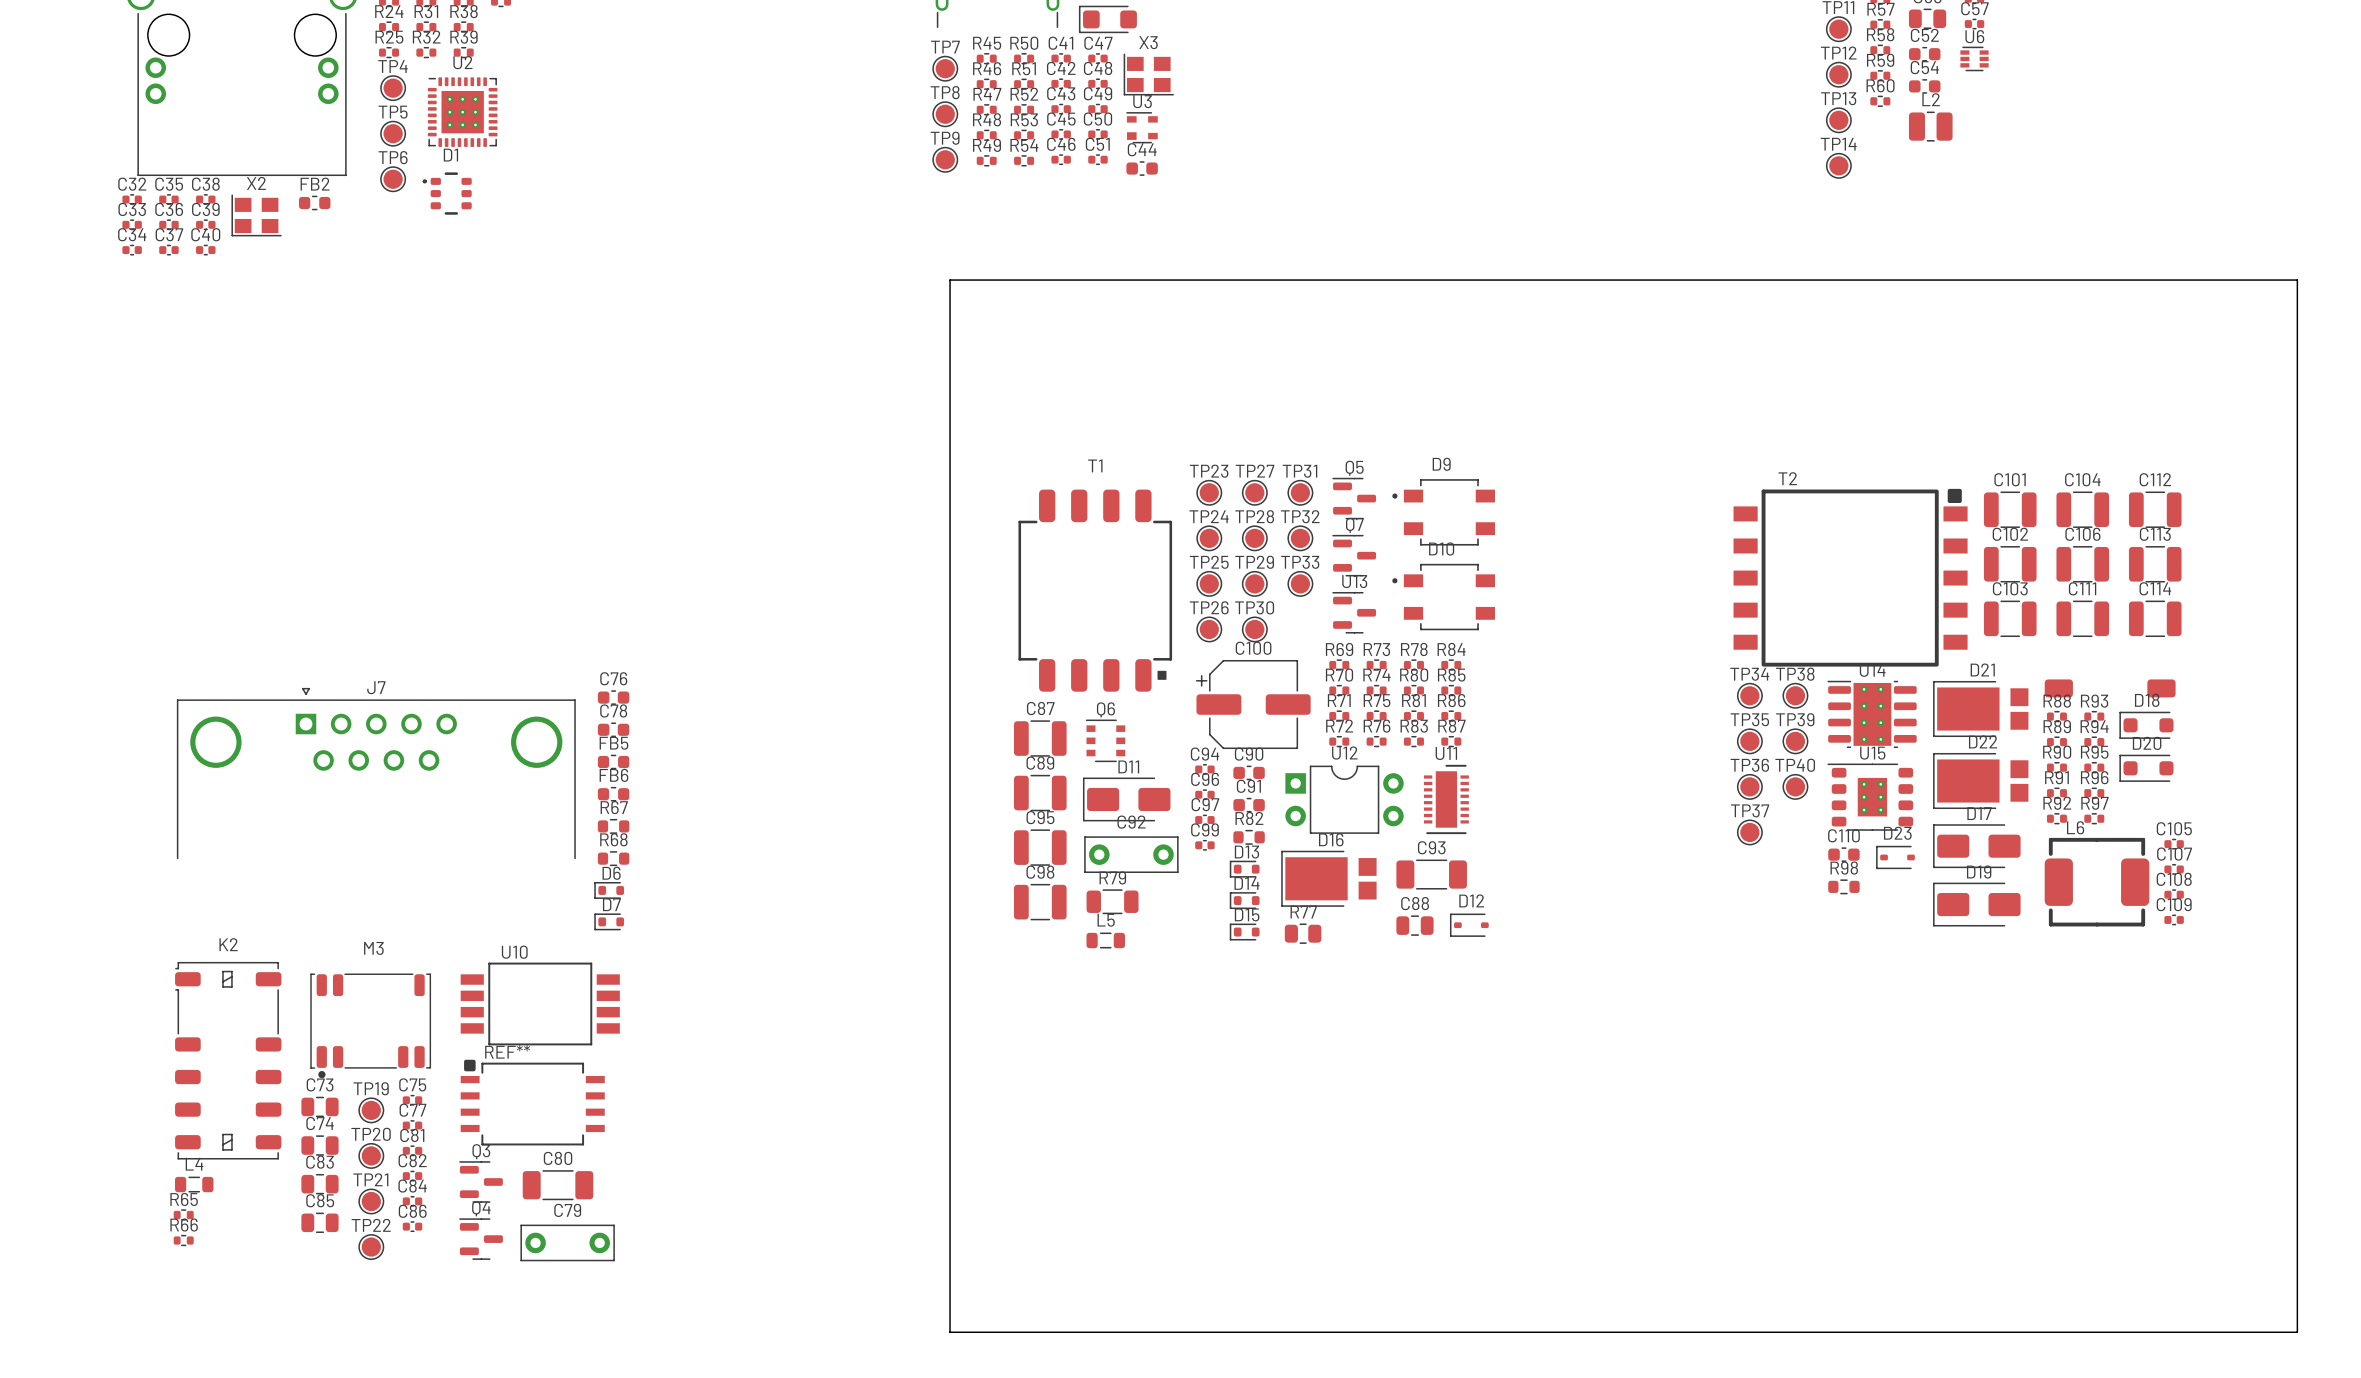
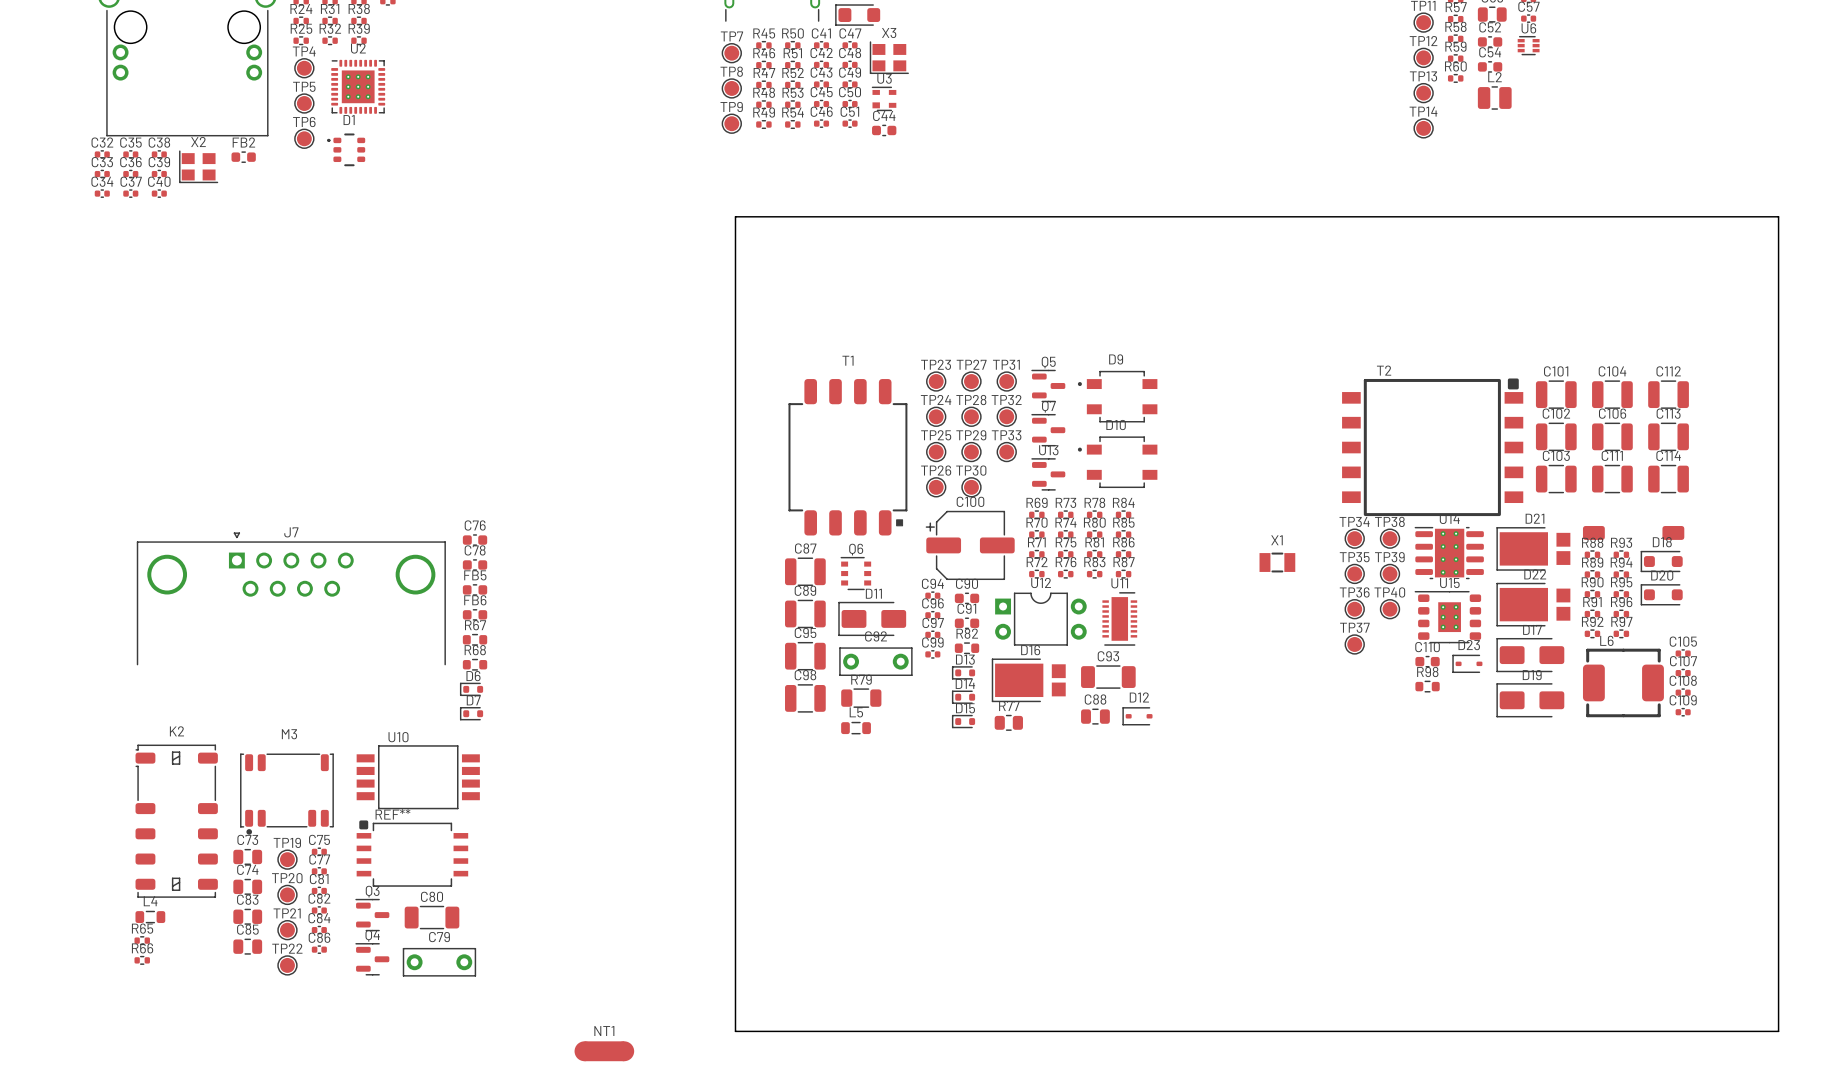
X1: none -> (1277, 562)
NT1: none -> (604, 1051)

